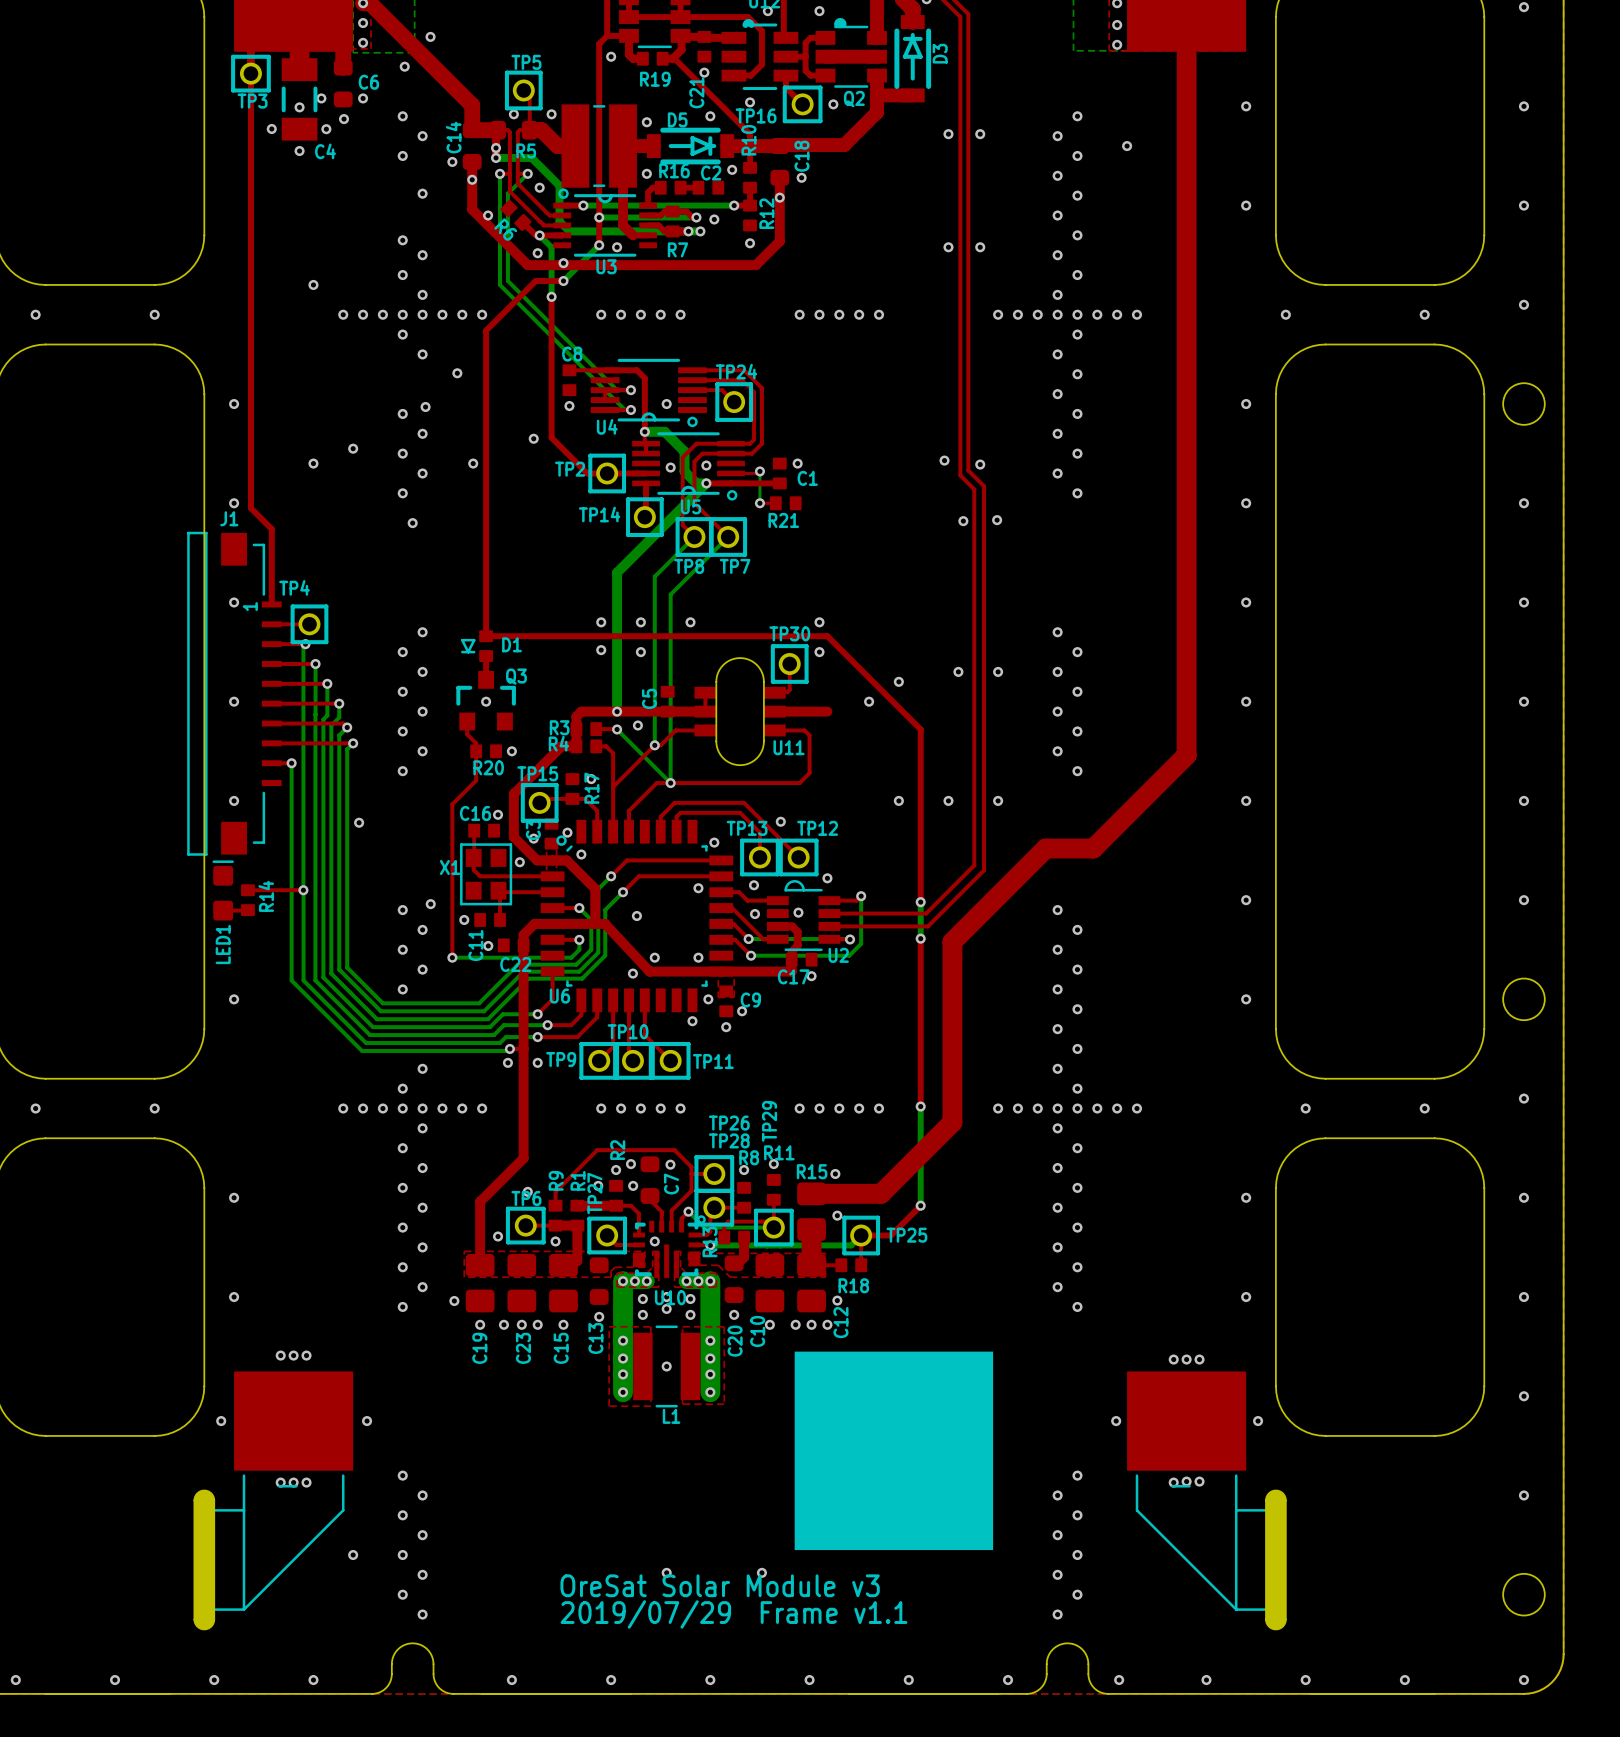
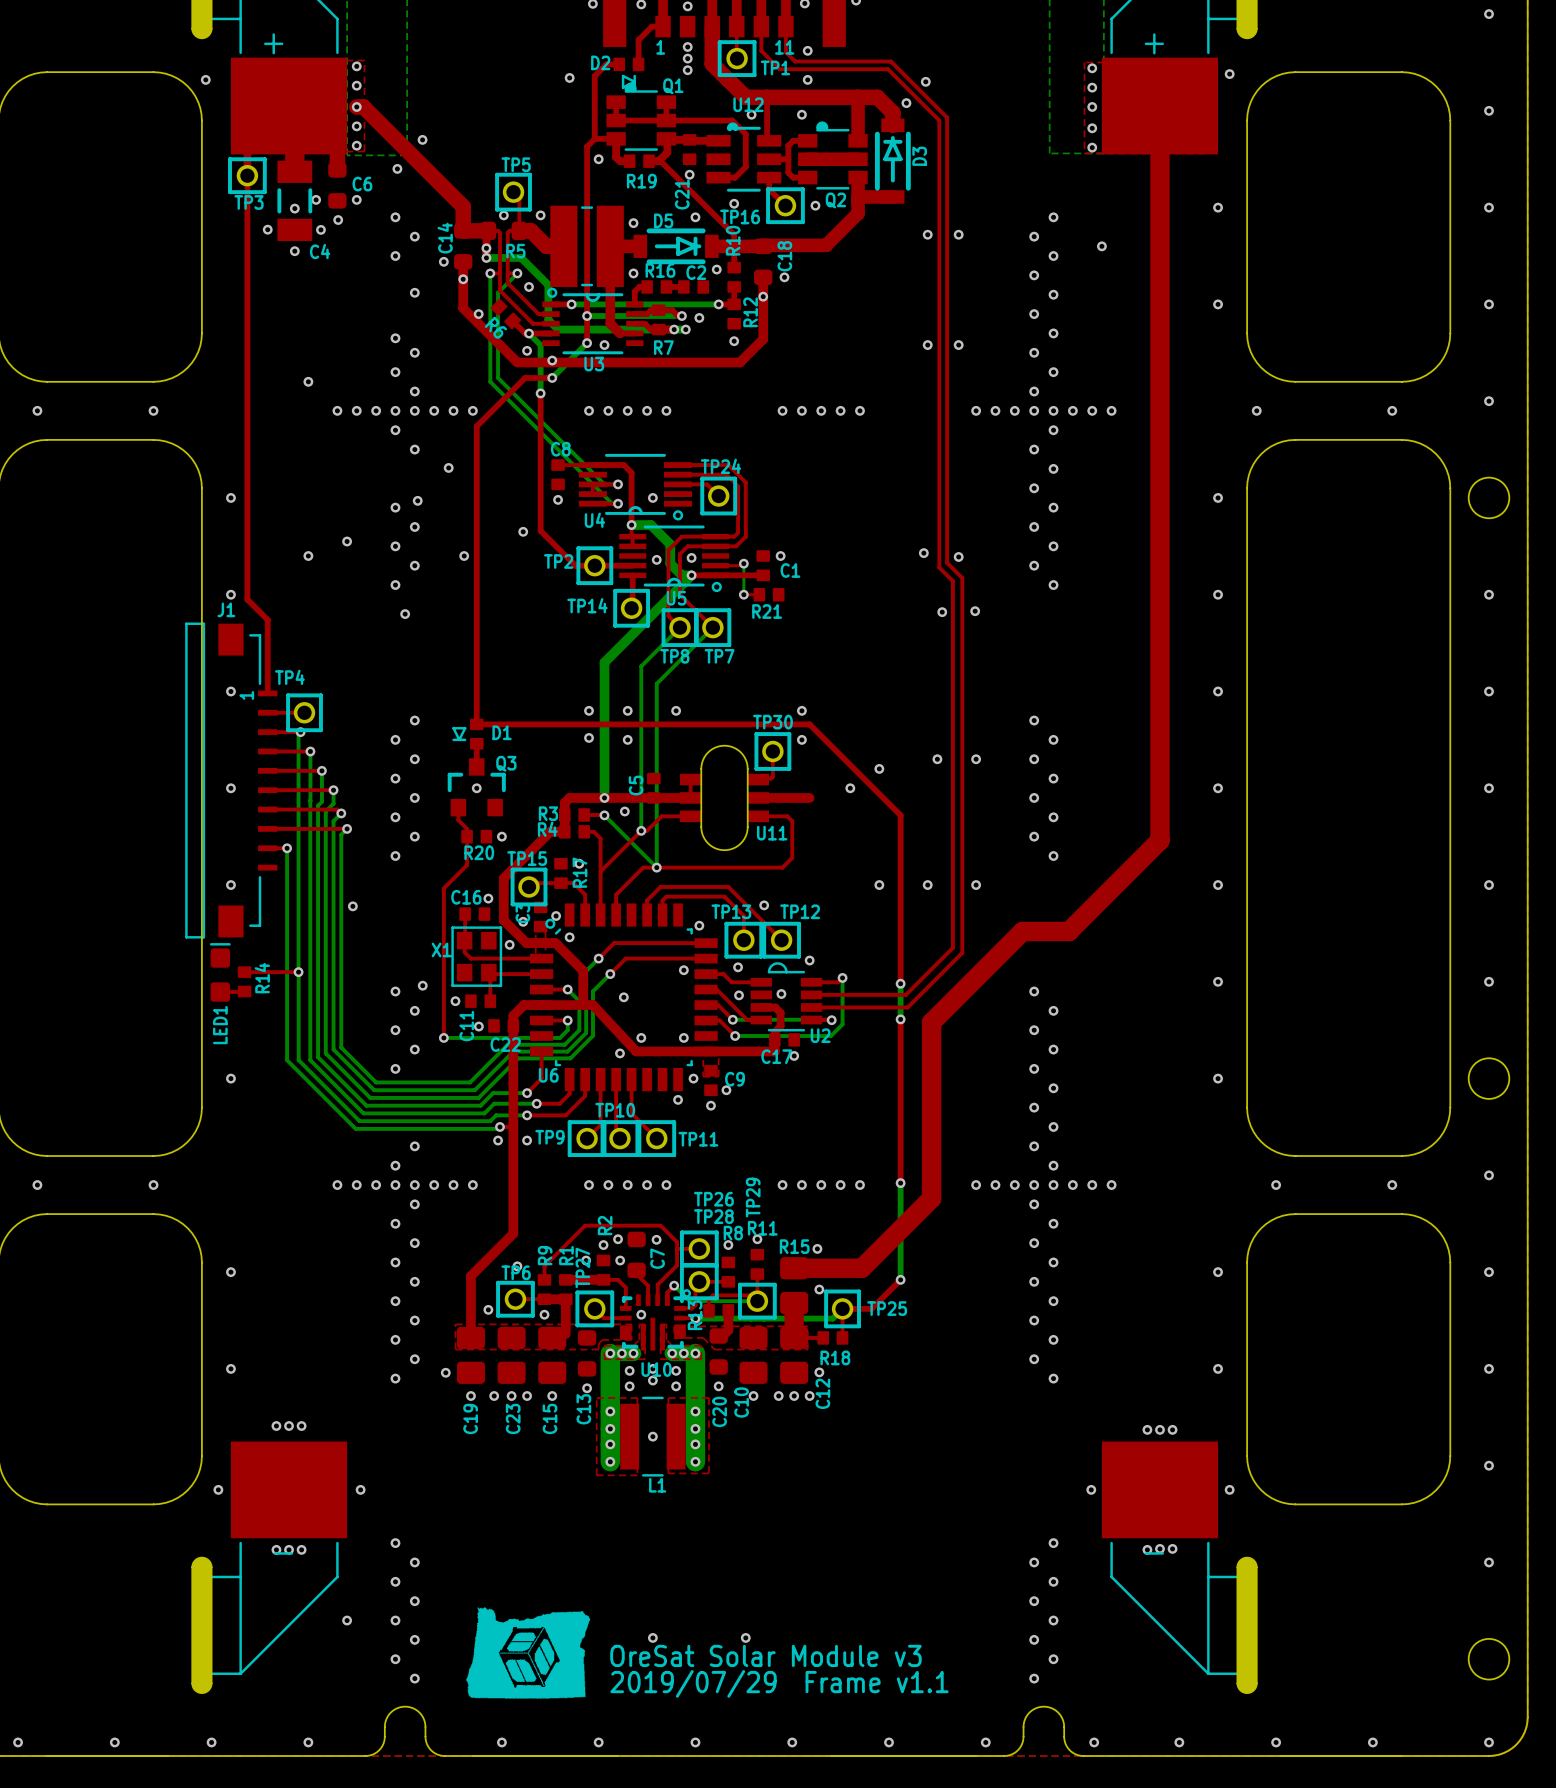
drawing: [794, 1351, 994, 1551] -> none
drawing: none -> [466, 1607, 591, 1699]
text position: OreSat Solar Module v3 (720, 1585) -> OreSat Solar Module v3 (765, 1655)
text position: Frame v1.1 (834, 1612) -> Frame v1.1 (877, 1682)
text position: 2019/07/29 (645, 1614) -> 2019/07/29 (693, 1683)

